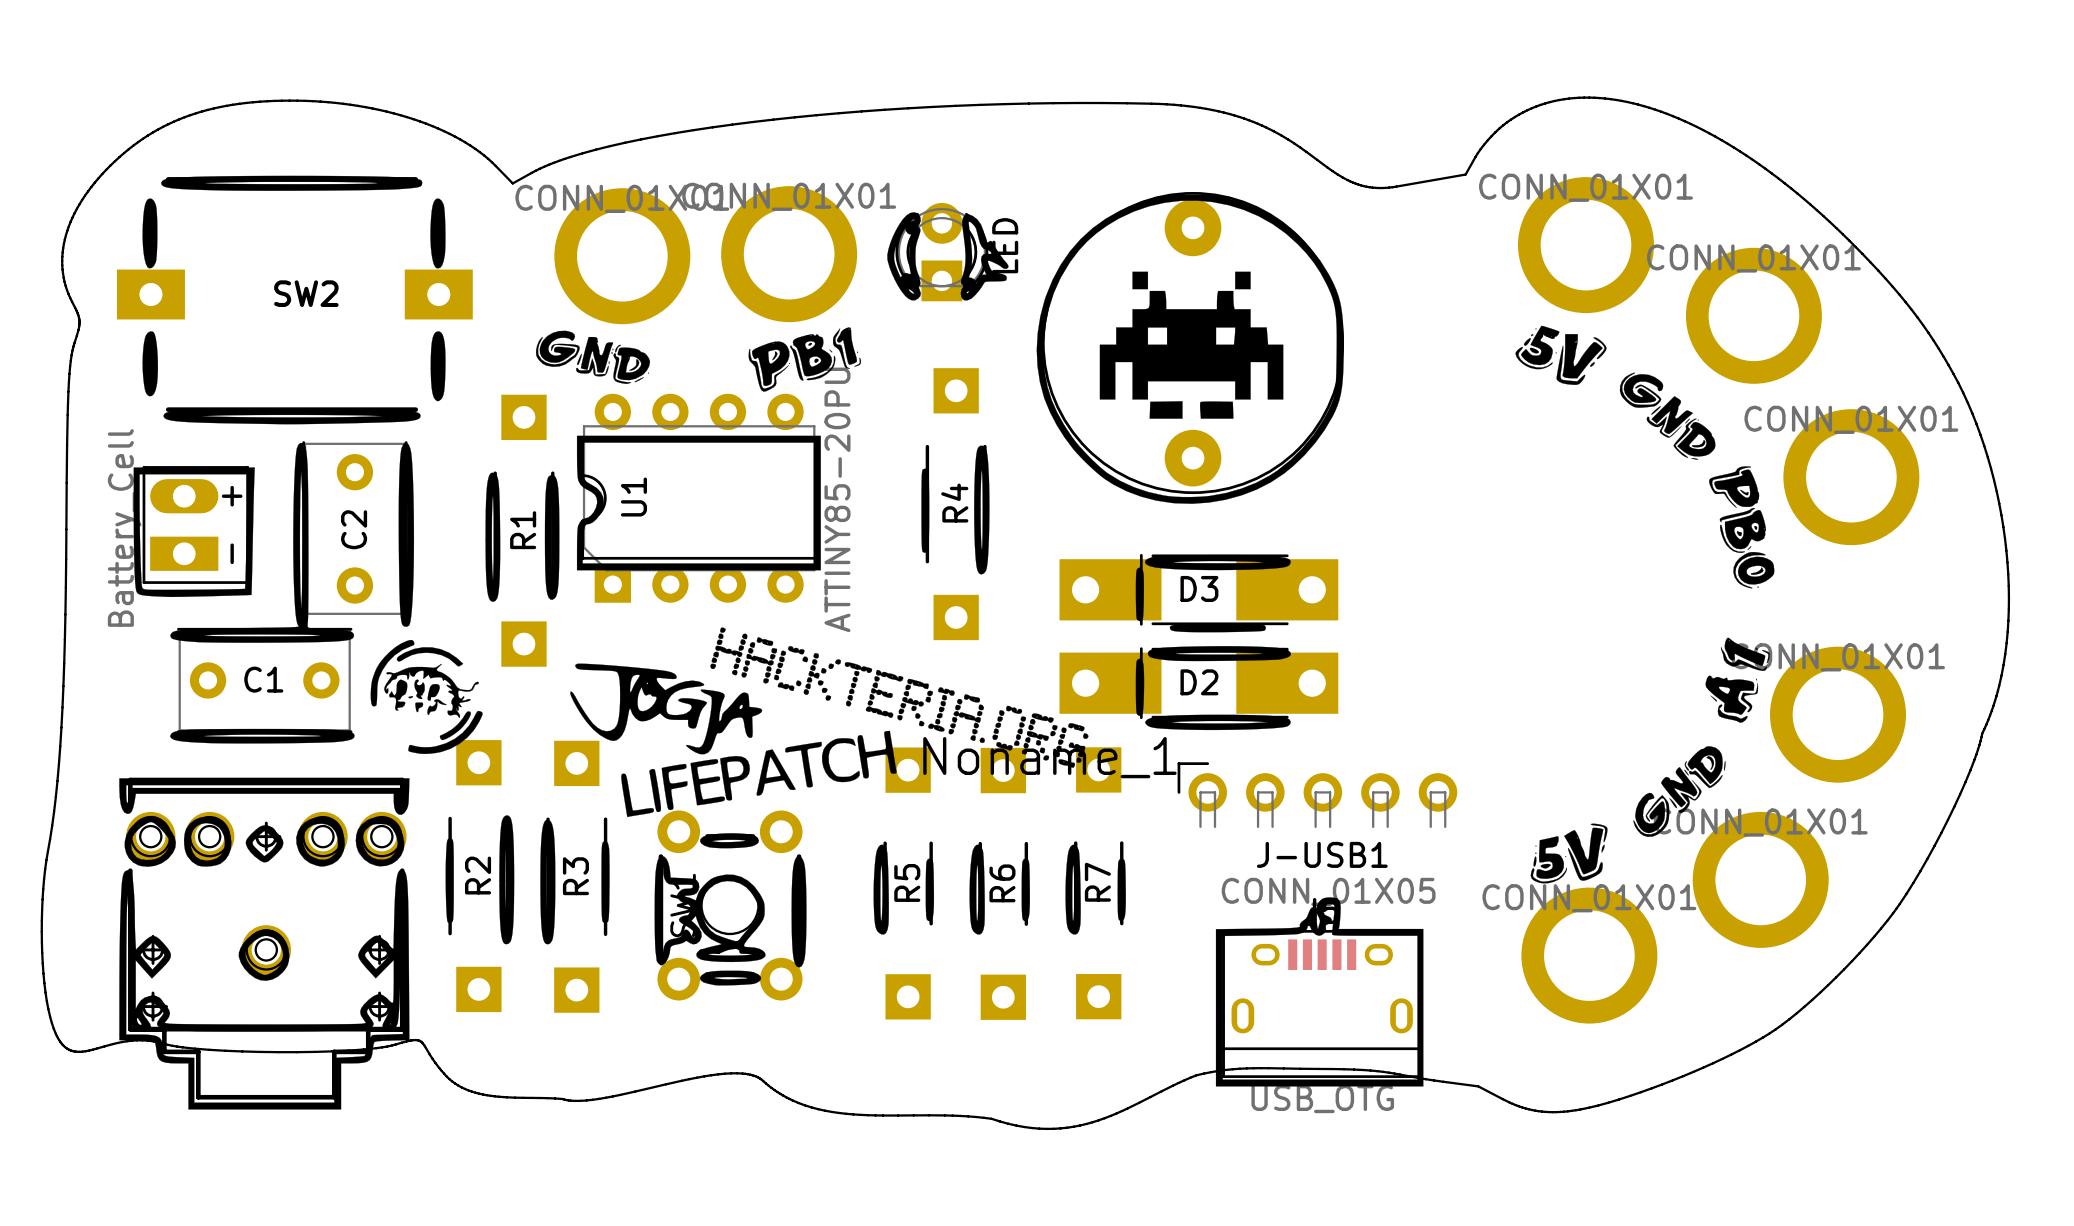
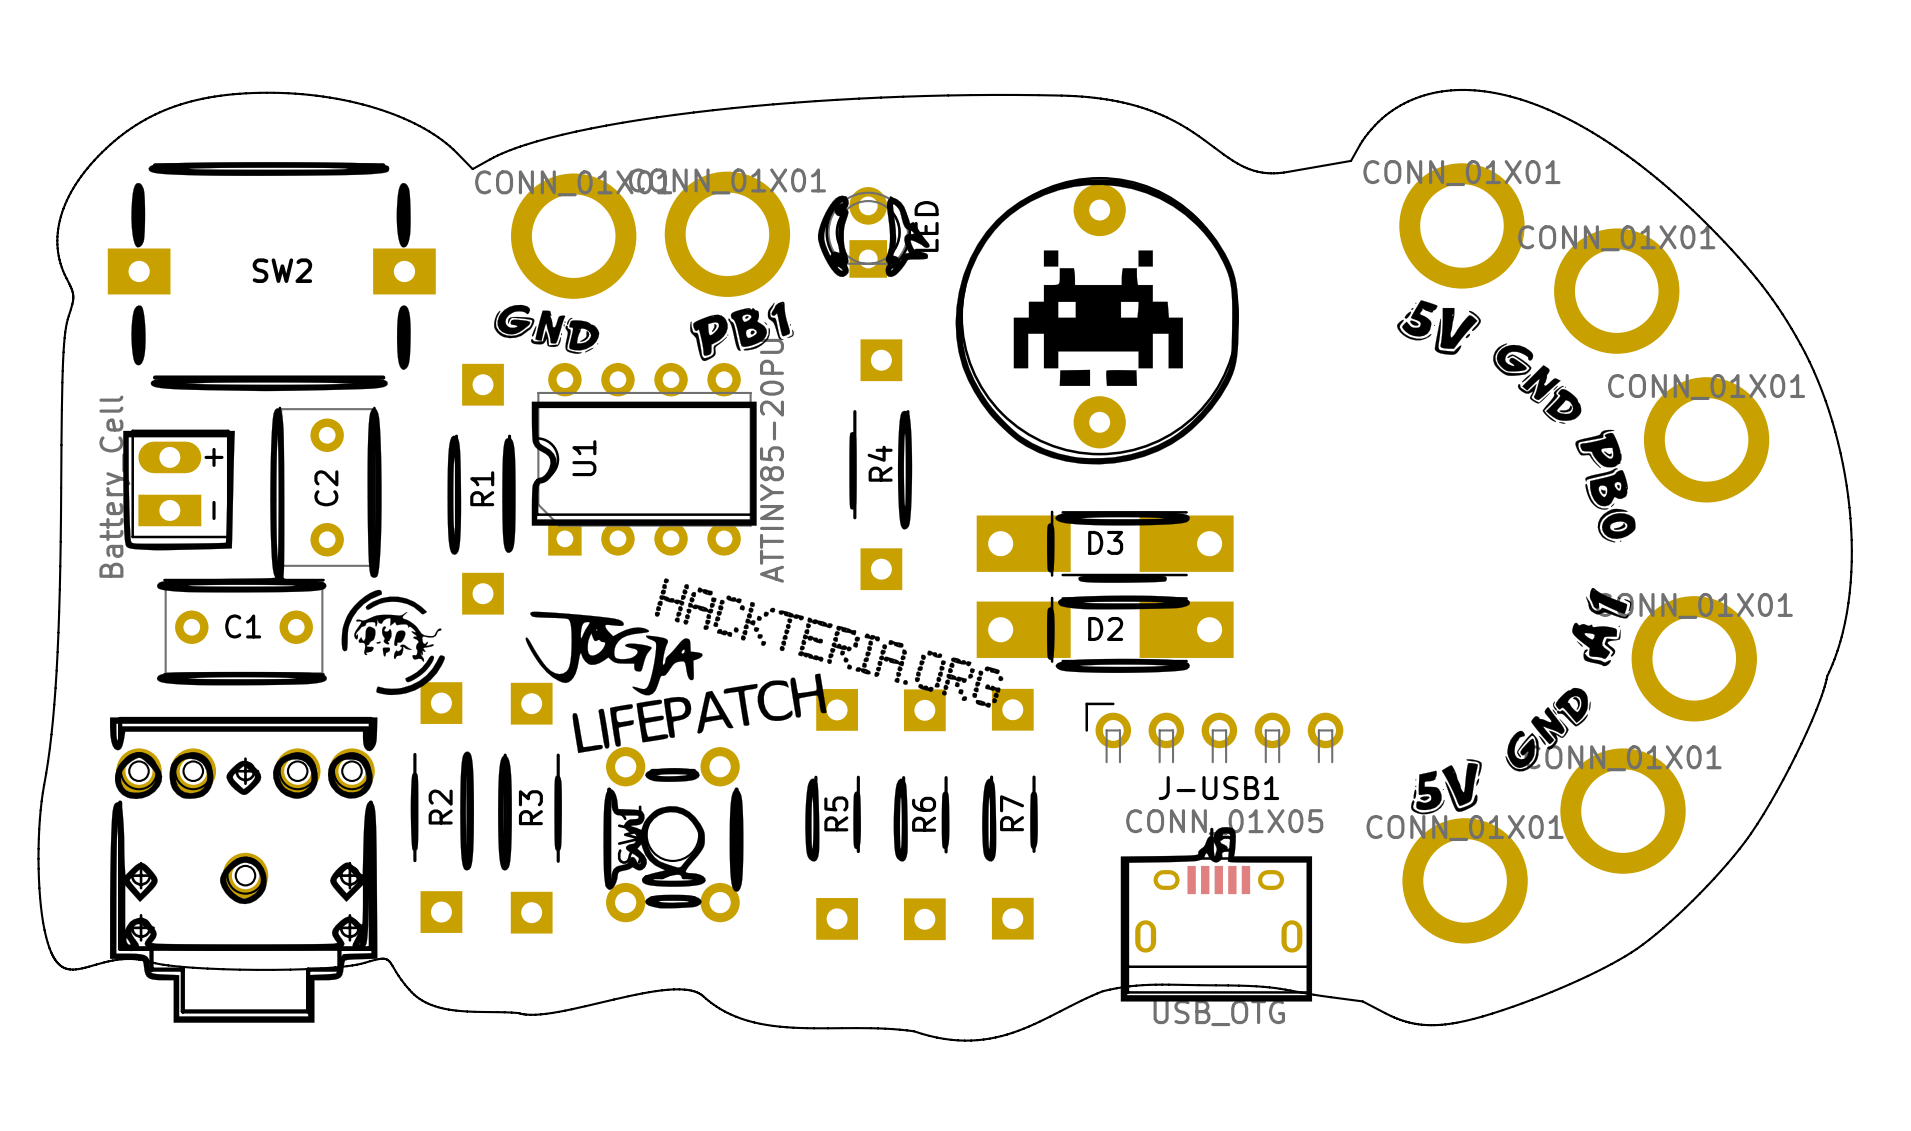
drawing: none -> [37, 88, 1853, 1042]
Noname_1: (1025, 613) -> none

